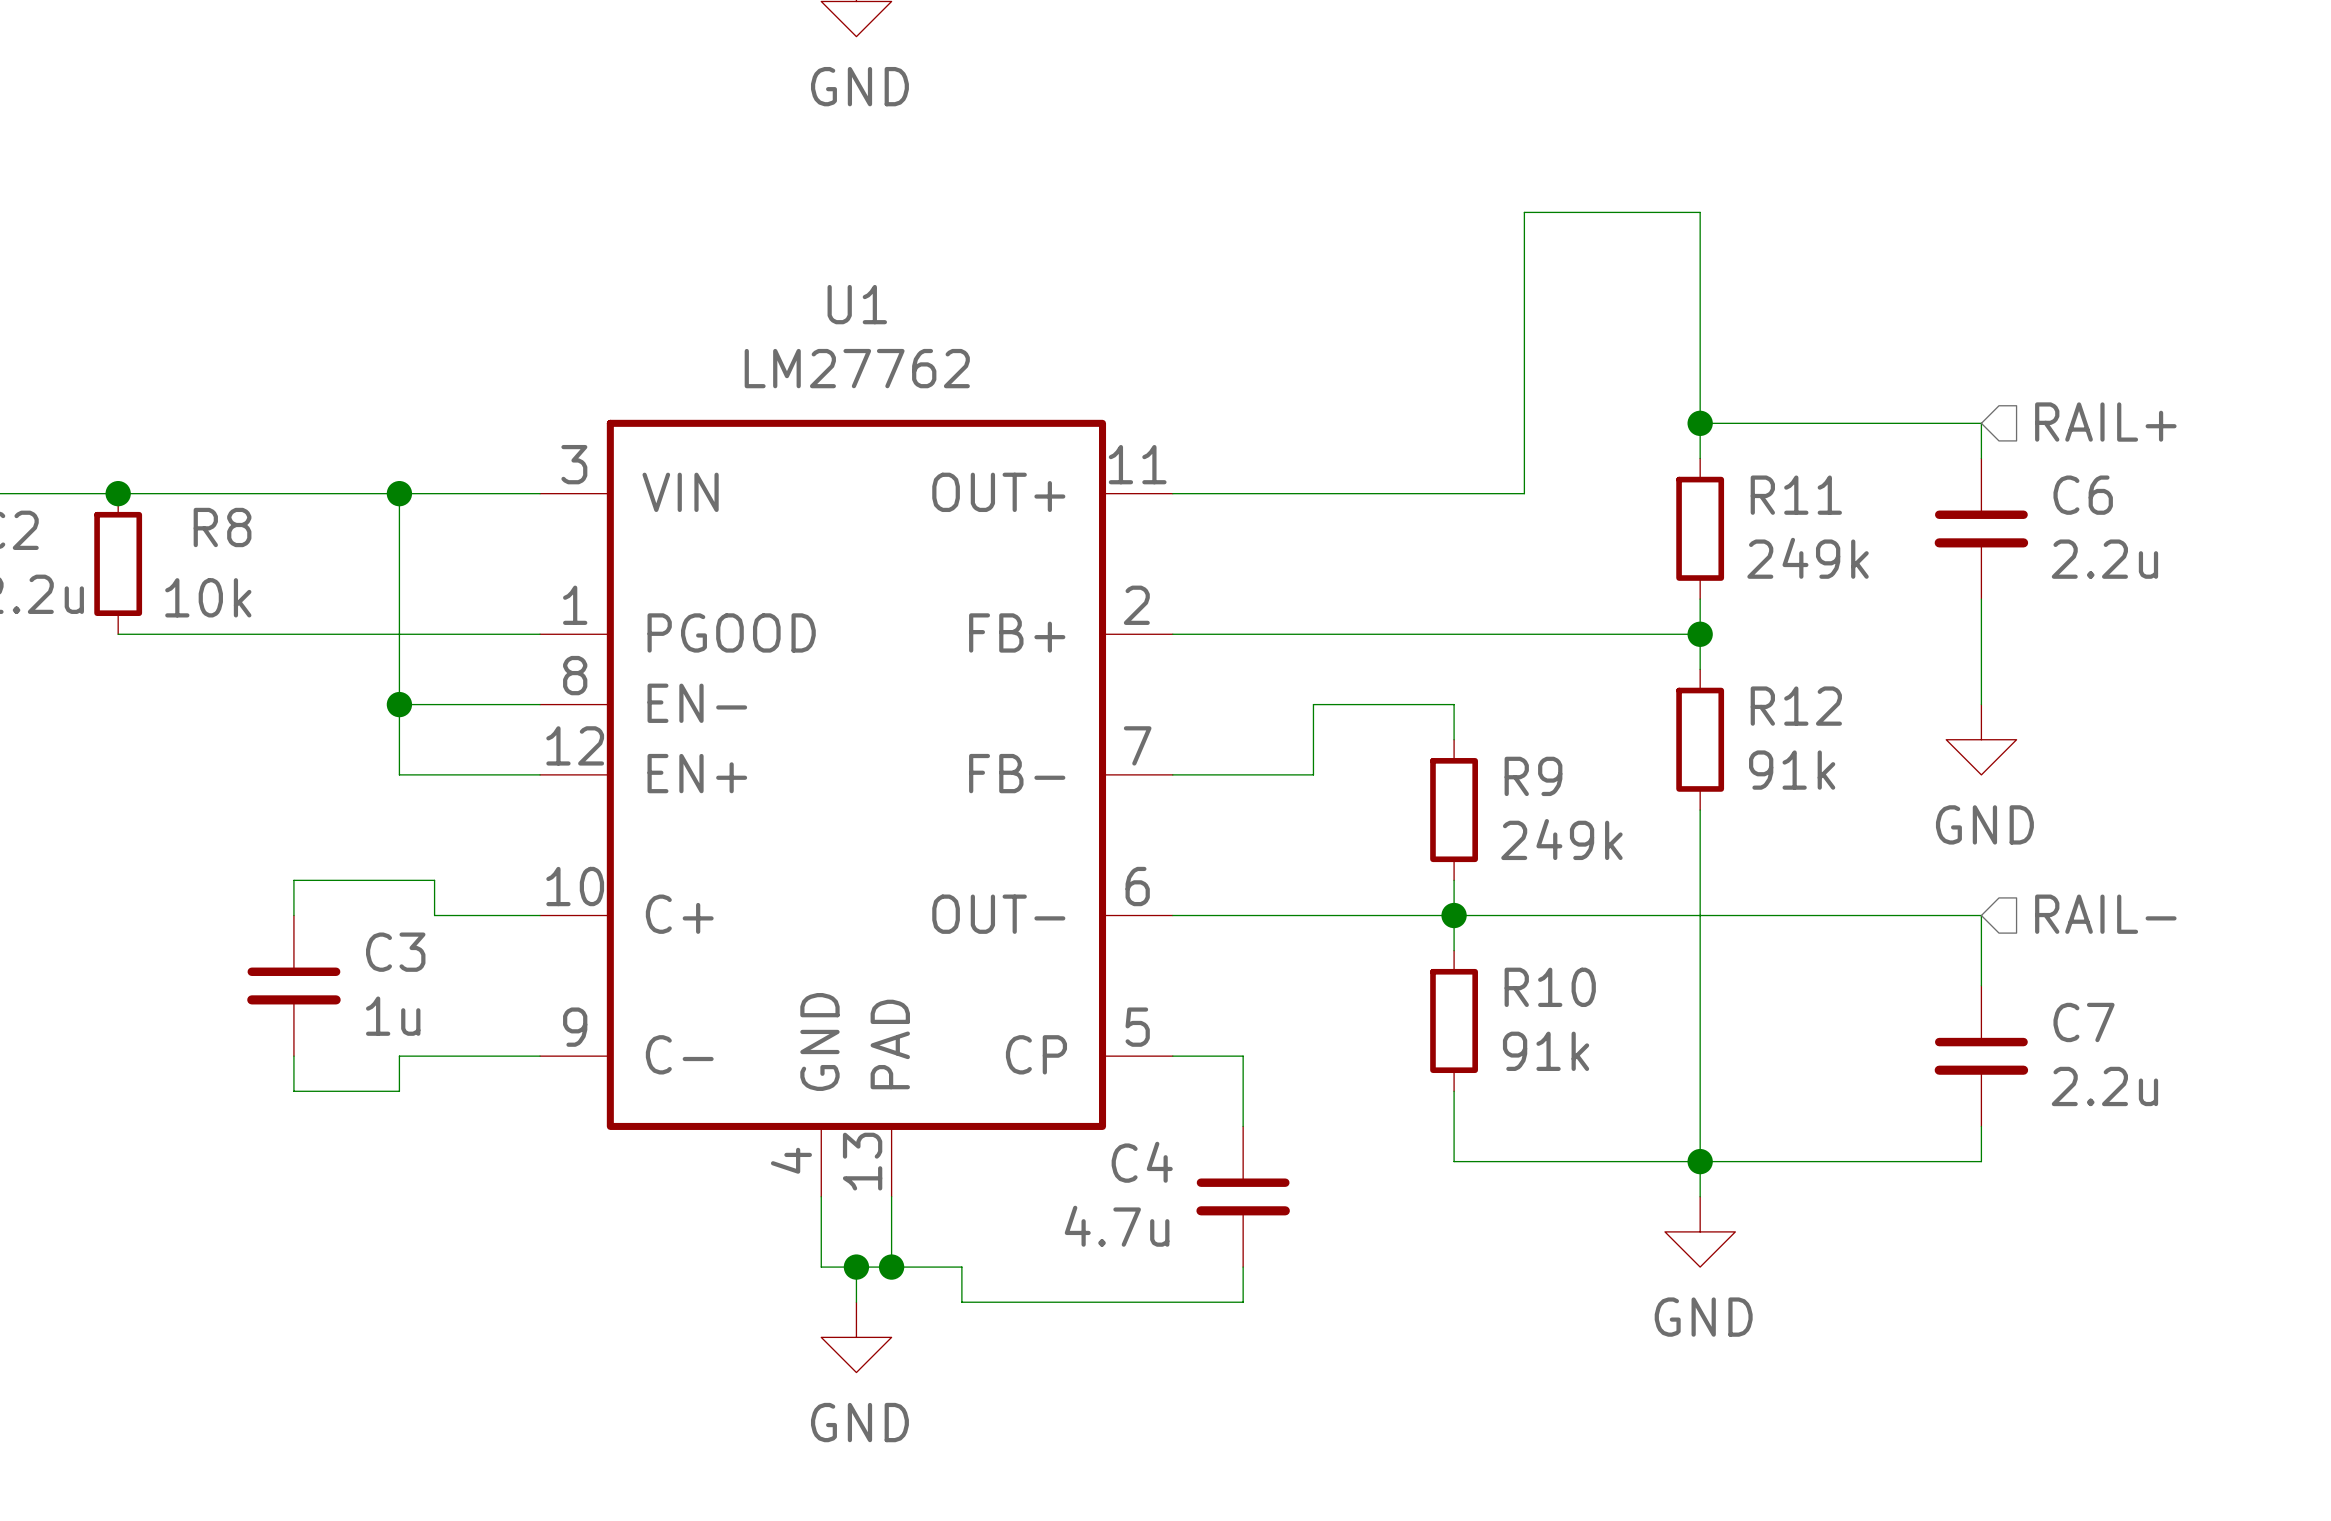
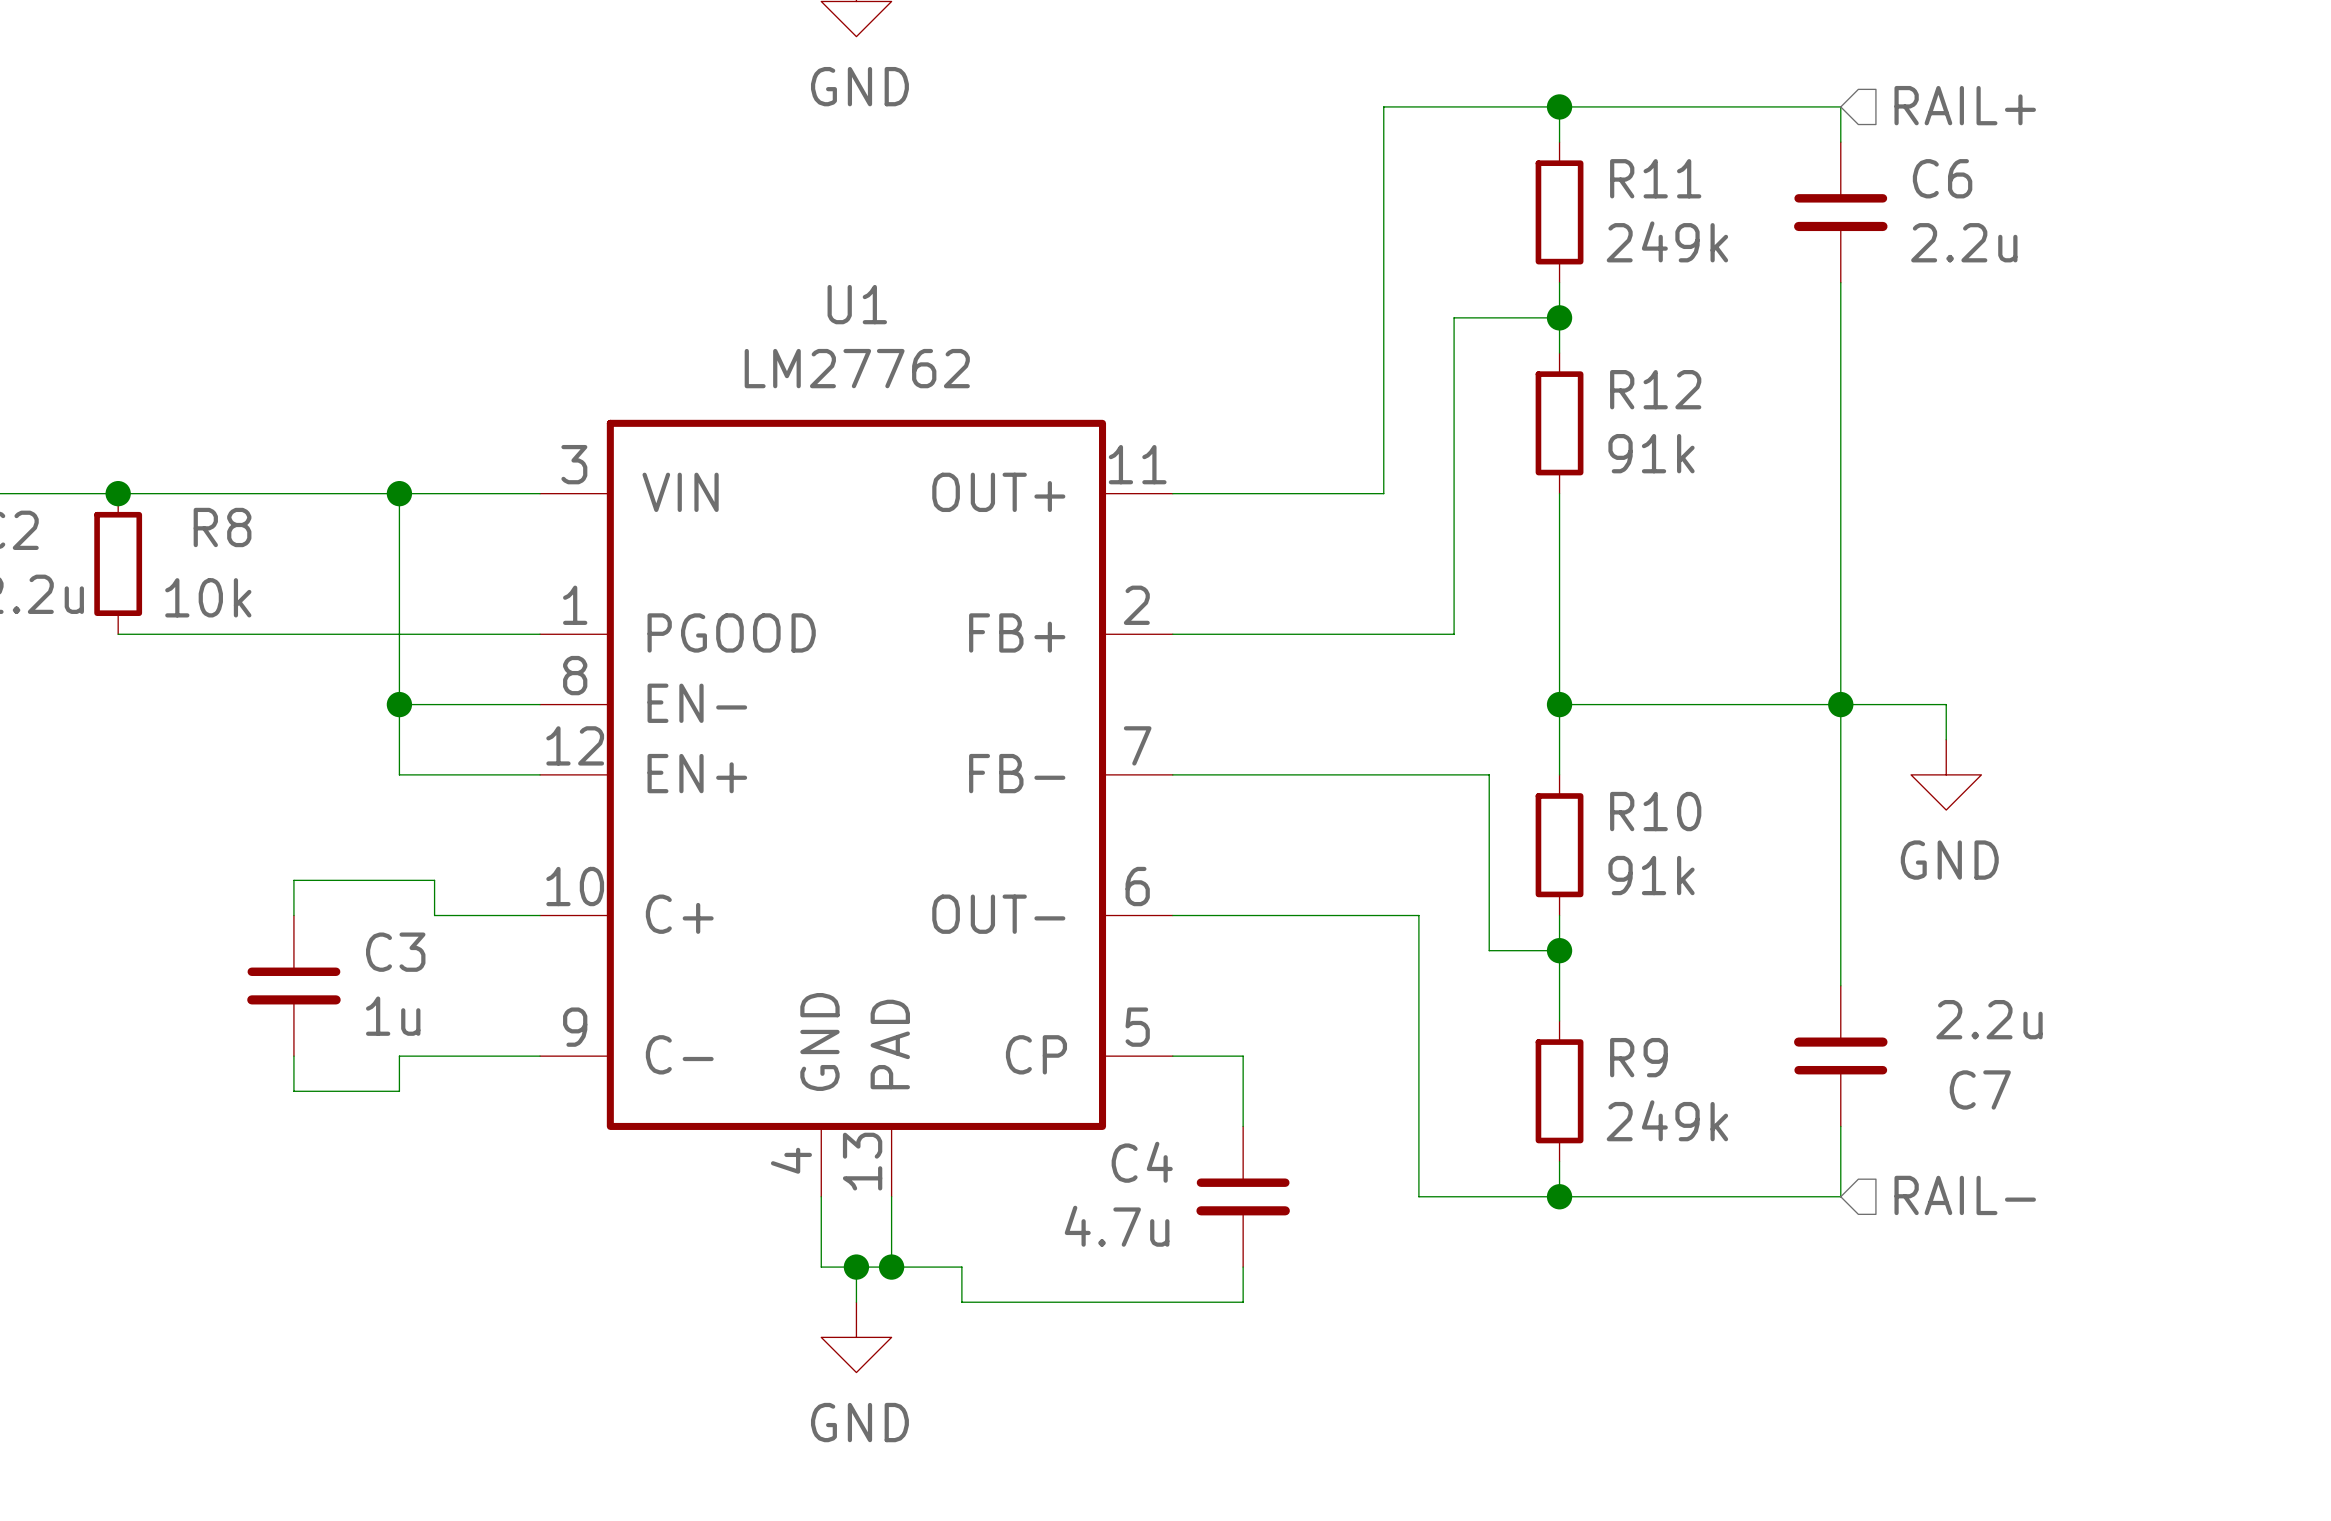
wire: none -> (1559, 106) (1559, 142)
junction: none -> (1559, 106)
wire: none -> (1840, 282) (1840, 985)
junction: none -> (1559, 317)
hierarchical label position: RAIL+ (2105, 422) -> RAIL+ (1965, 105)
wire: (1700, 423) (1981, 423) (1981, 458) -> none
junction: (1700, 423) -> none
wire: (1700, 458) (1700, 212) (1524, 212) (1524, 493) (1383, 493) -> (1840, 142) (1840, 106) (1383, 106) (1383, 493)
wire: none -> (1559, 493) (1559, 774)
R11 position: (1700, 528) -> (1559, 212)
C6 position: (1981, 528) -> (1840, 212)
wire: (1700, 599) (1700, 669) -> (1559, 282) (1559, 353)
wire: (1981, 599) (1981, 704) -> (1559, 915) (1559, 1020)
wire: (1454, 634) (1700, 634) -> (1454, 634) (1454, 317) (1559, 317)
junction: (1700, 634) -> none
wire: none -> (1559, 704) (1946, 704) (1946, 739)
junction: none -> (1559, 704)
junction: none -> (1840, 704)
wire: (1454, 739) (1454, 704) (1313, 704) (1313, 774) -> (1559, 950) (1489, 950) (1489, 774) (1313, 774)
R12 position: (1700, 739) -> (1559, 423)
power symbol position: GND (1981, 739) -> GND (1946, 774)
R9 position: (1454, 810) -> (1559, 1091)
wire: (1700, 810) (1700, 1196) -> none
wire: (1454, 880) (1454, 950) -> none
hierarchical label position: RAIL- (2105, 914) -> RAIL- (1965, 1195)
wire: (1418, 915) (1981, 915) (1981, 985) -> (1418, 915) (1418, 1196) (1840, 1196) (1840, 1126)
junction position: (1454, 915) -> (1559, 950)
R10 position: (1454, 1020) -> (1559, 845)
C7 name position: C7 (2084, 1022) -> C7 (1980, 1089)
C7 rotation: 0° (1981, 1056) -> 180° (1840, 1055)
C7 position: (1981, 1056) -> (1840, 1056)
C7 value position: 2.2u (2104, 1086) -> 2.2u (1989, 1019)
wire: (1454, 1091) (1454, 1161) (1981, 1161) (1981, 1126) -> none
wire: none -> (1559, 1161) (1559, 1196)
junction: (1700, 1161) -> none
junction: none -> (1559, 1196)
power symbol: GND (1700, 1231) -> none

